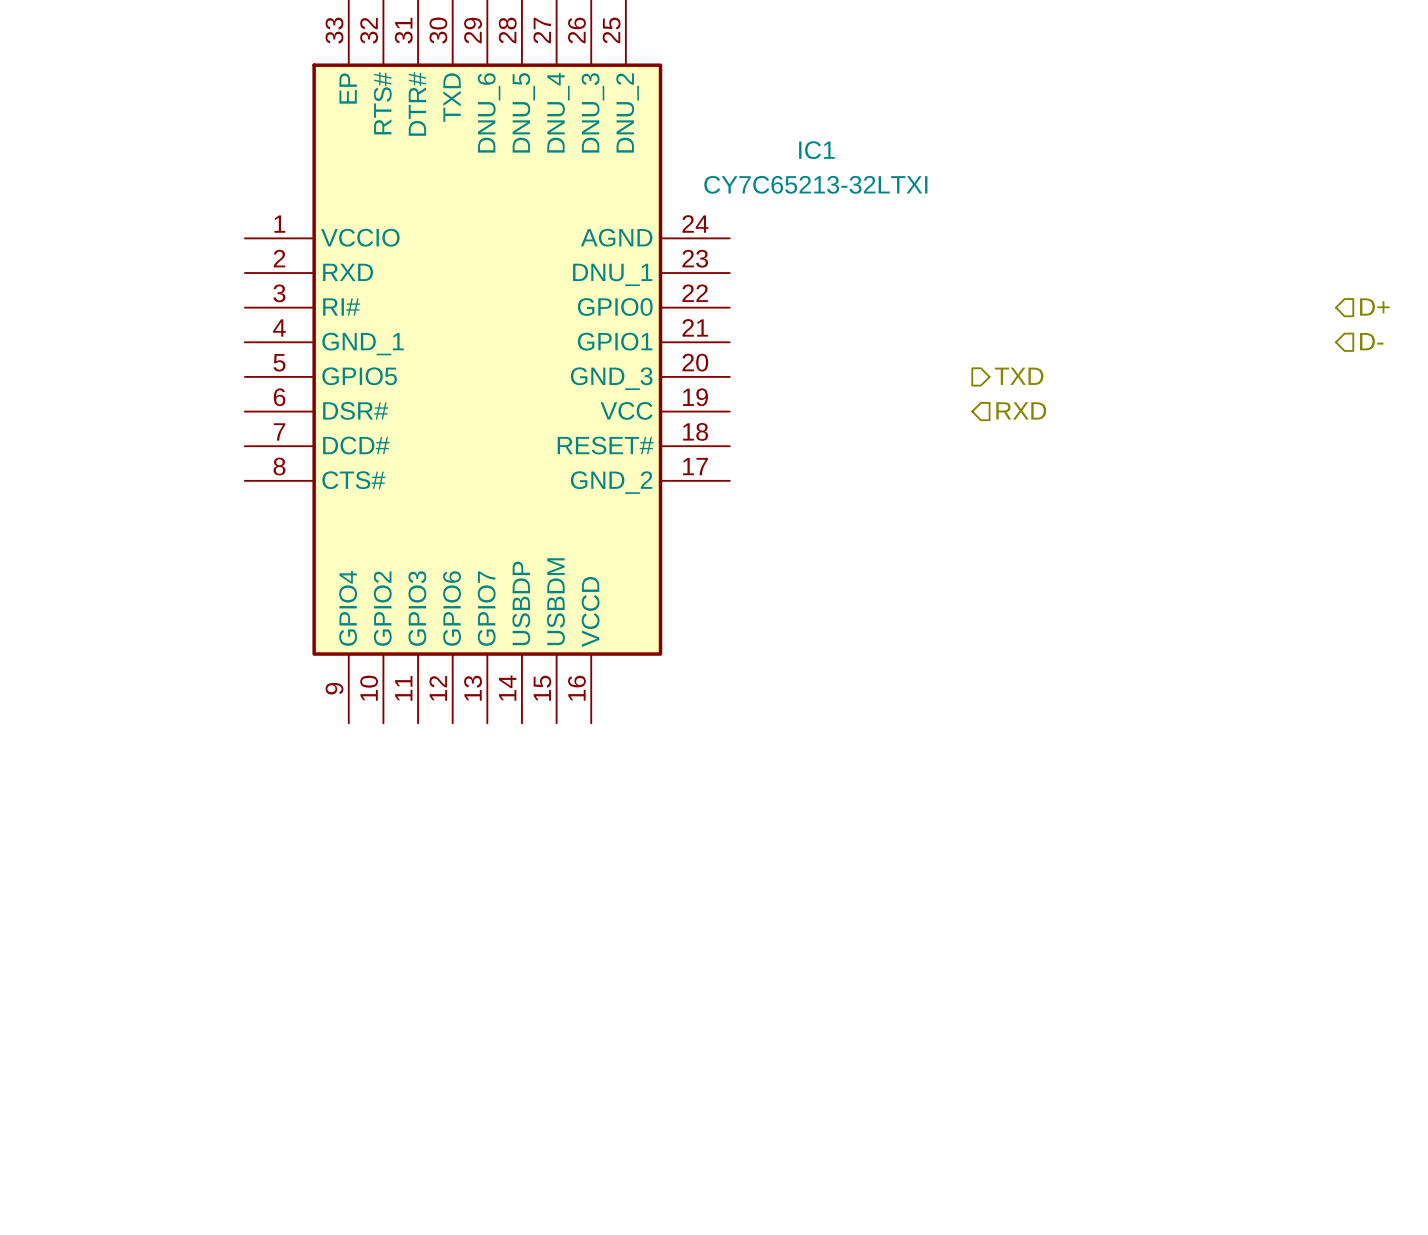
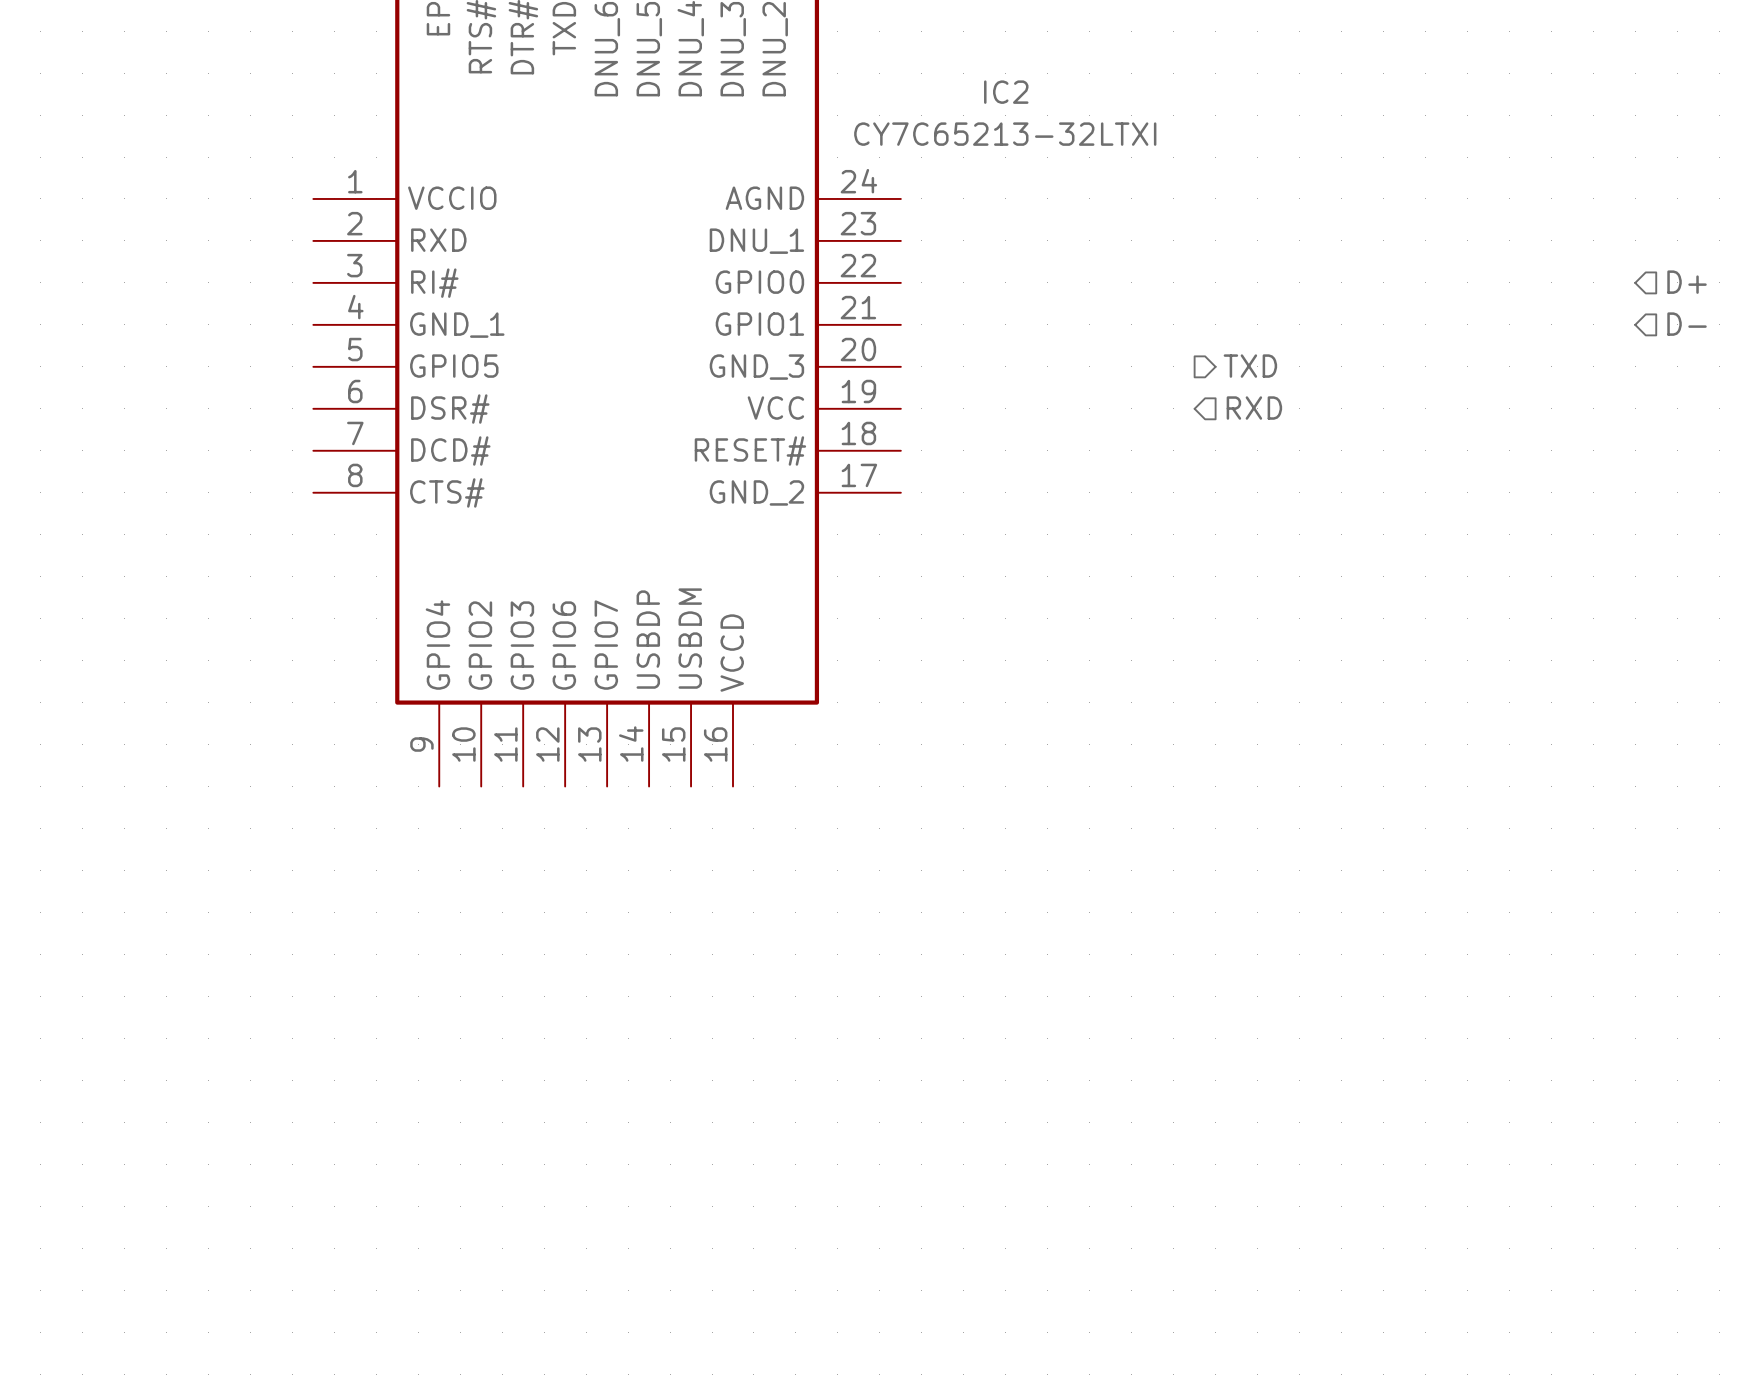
IC1 name: IC1 (816, 150) -> IC2 (1006, 92)

